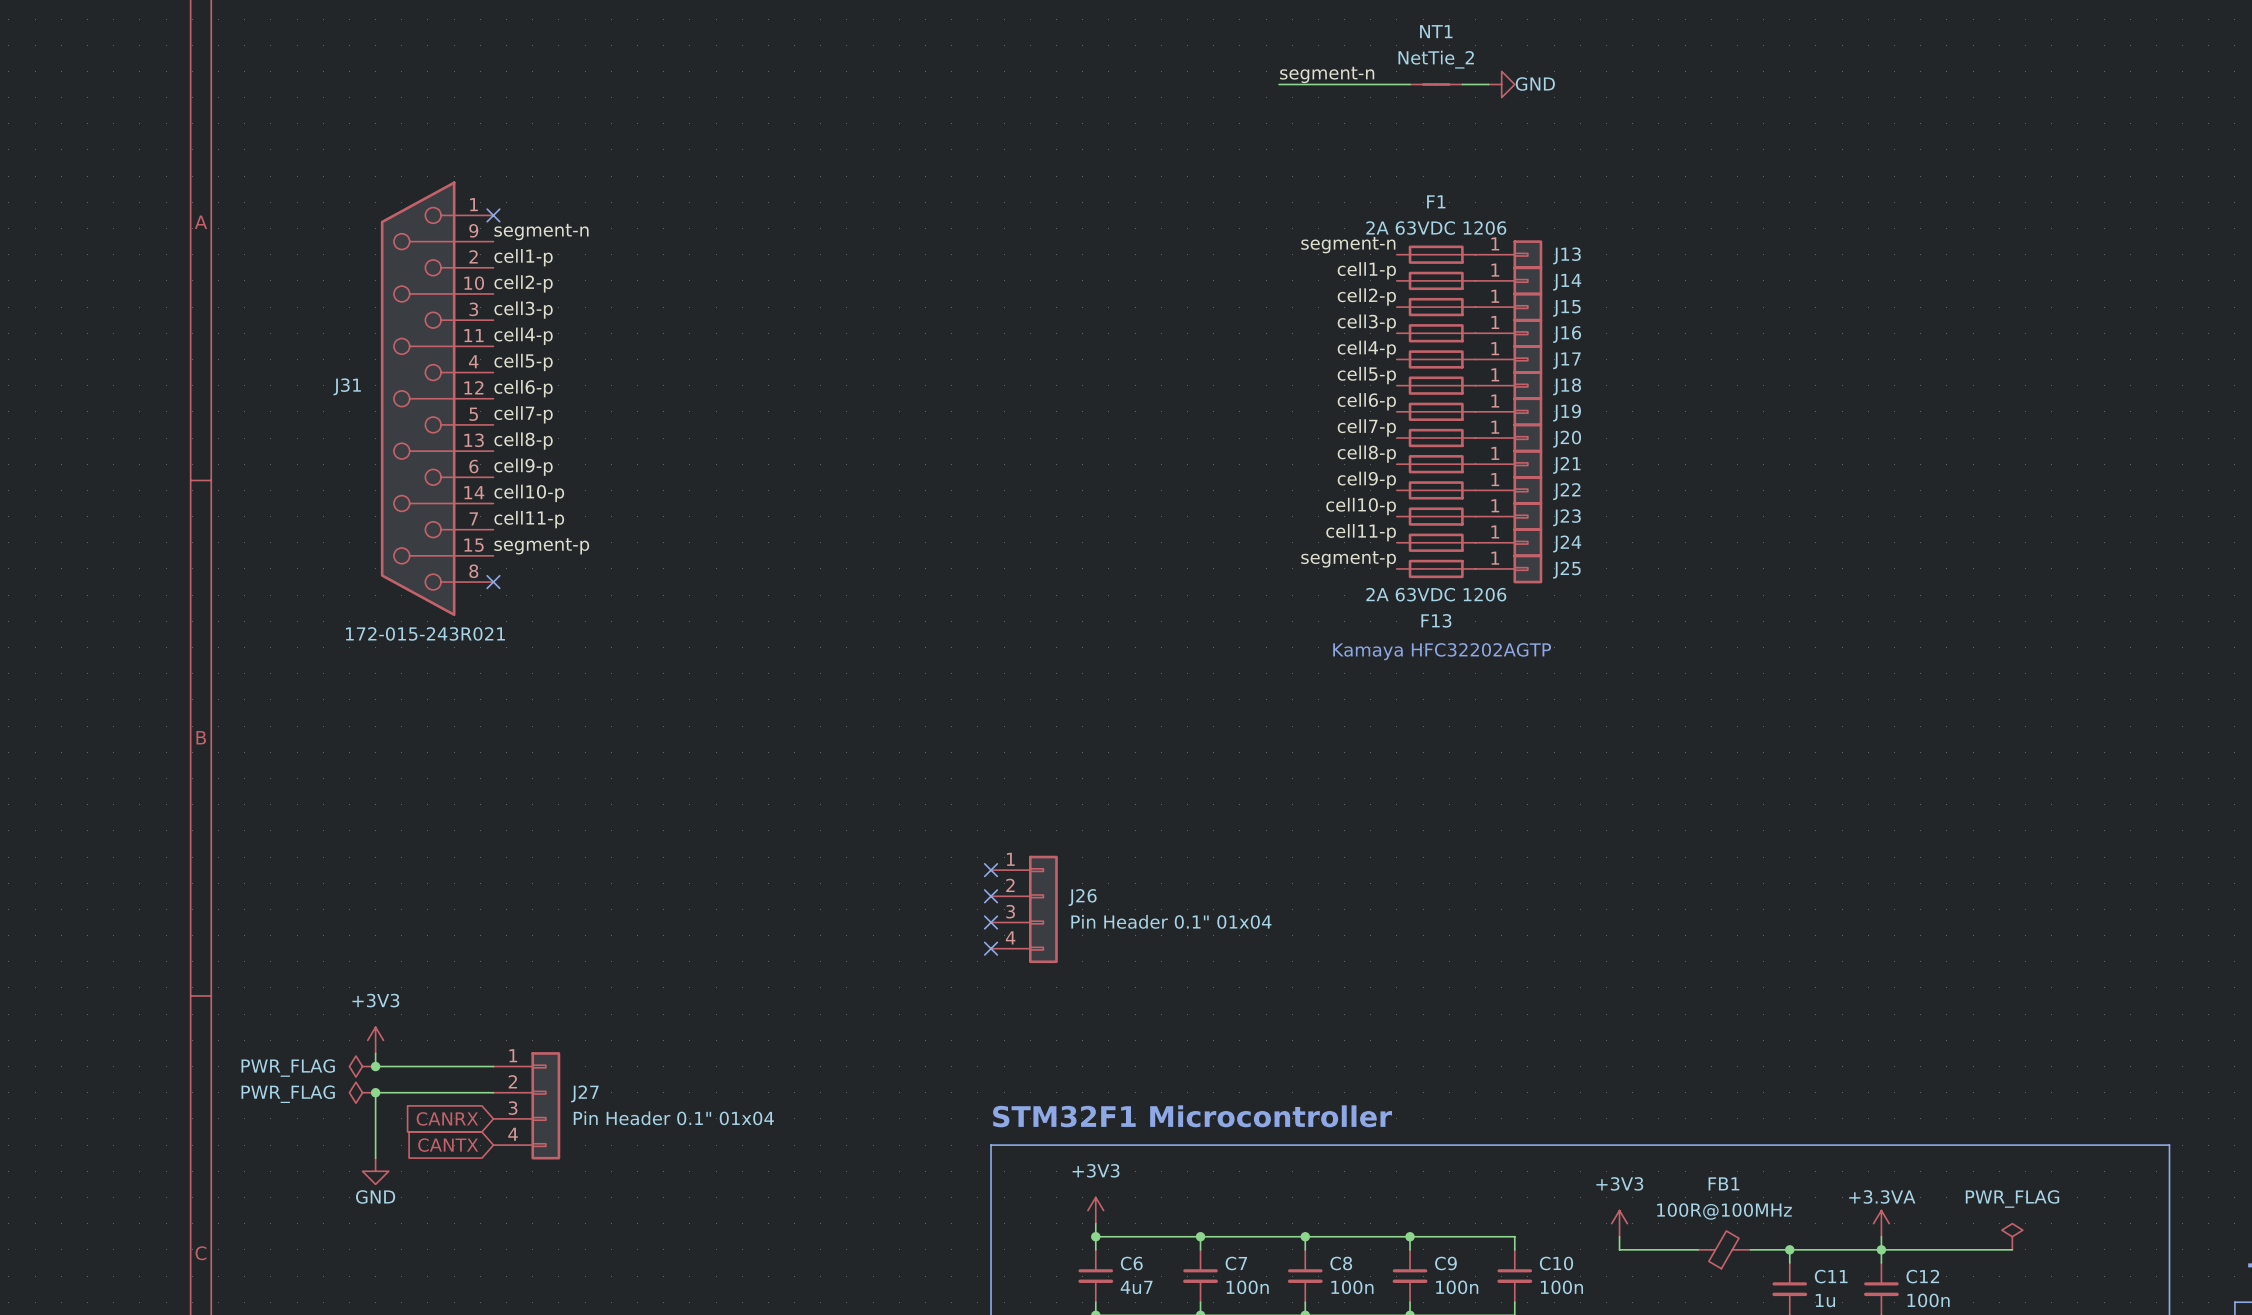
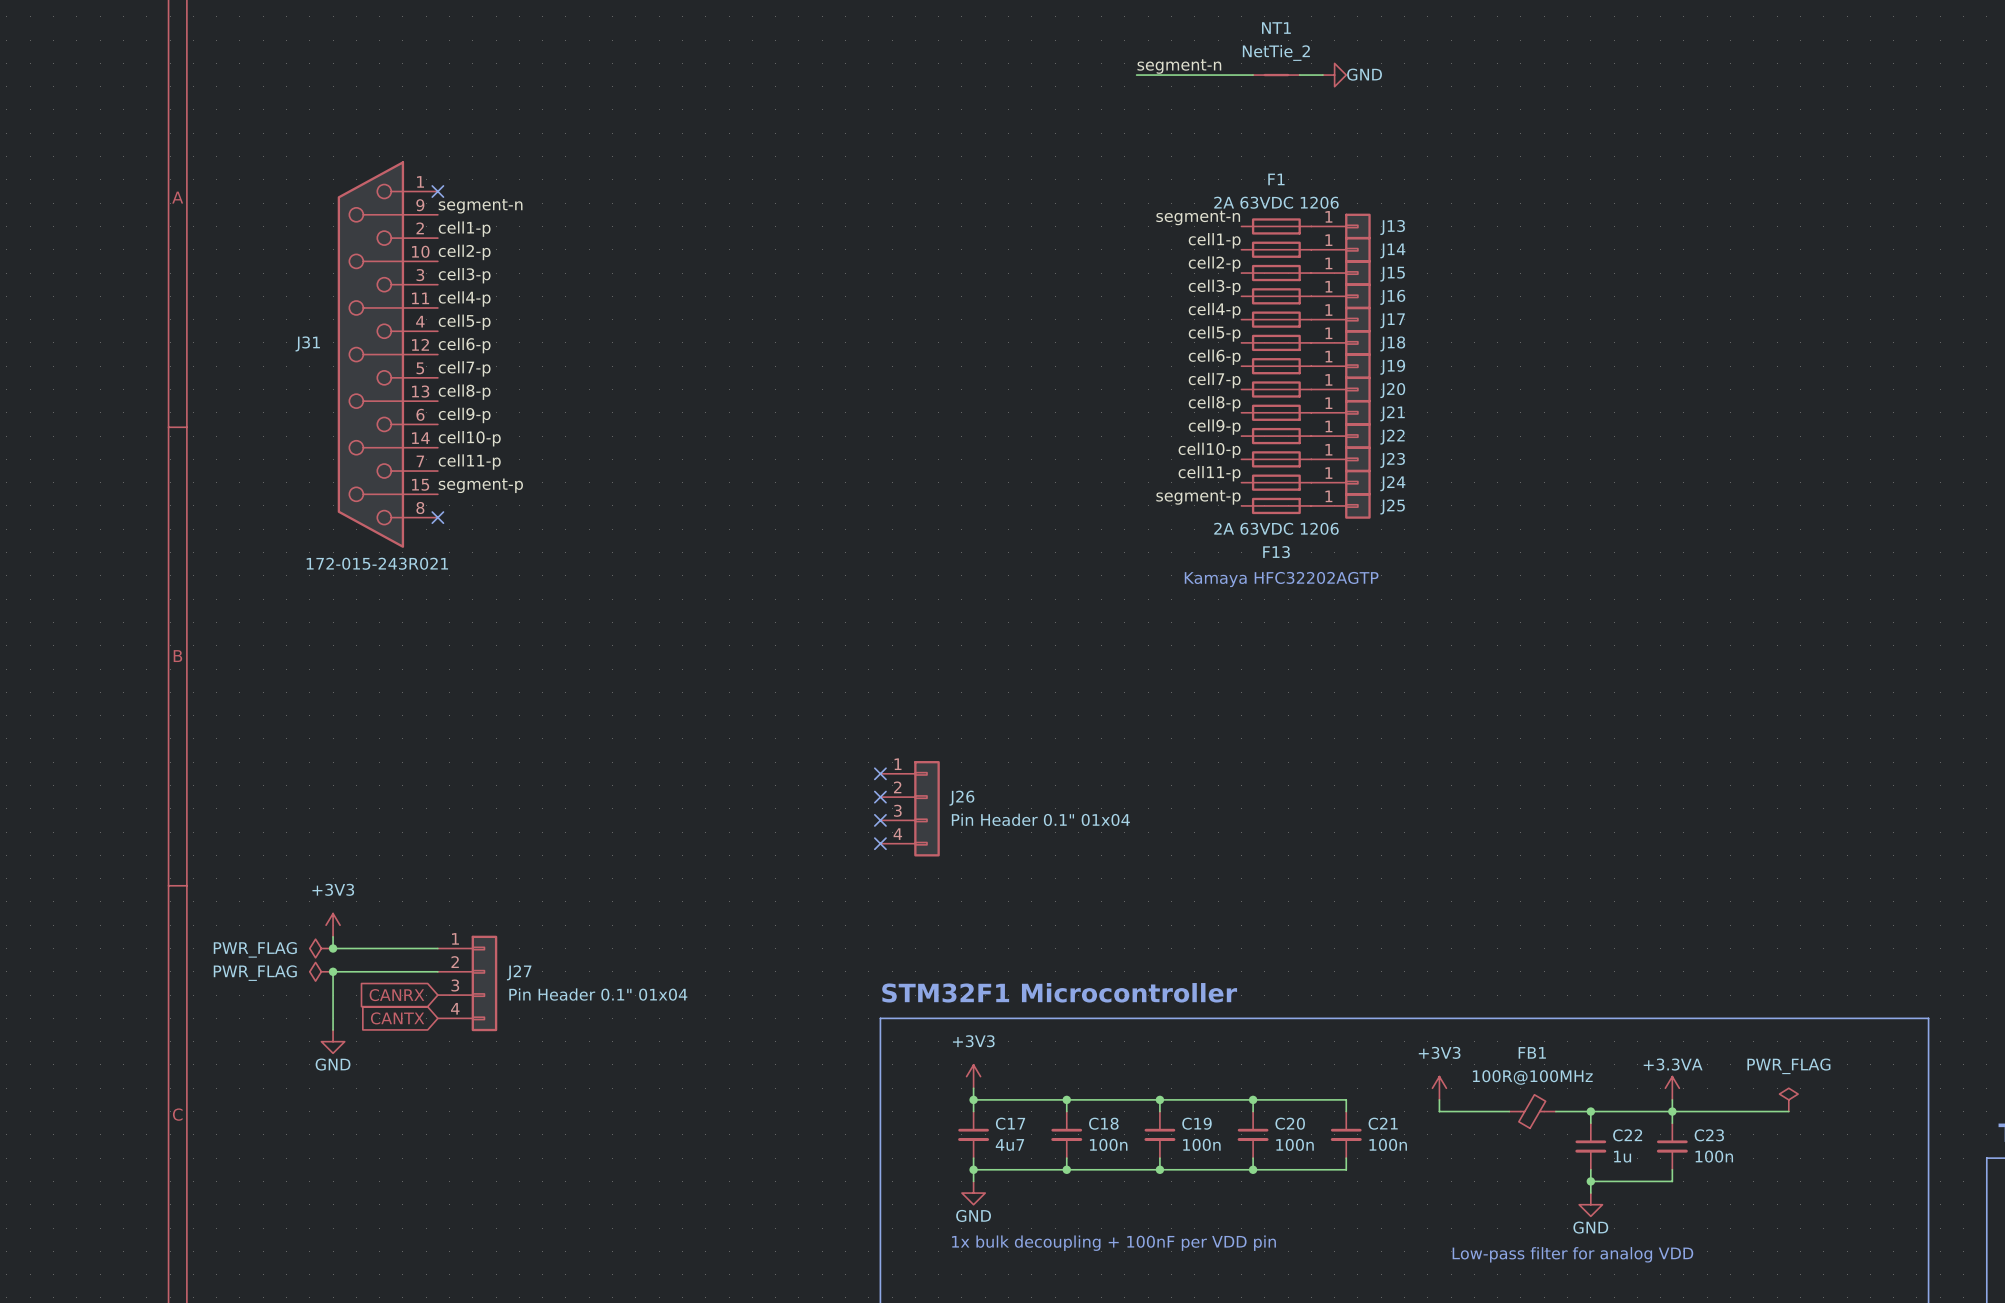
C6 name: C6 (1131, 1263) -> C17 (1010, 1123)
C7 name: C7 (1236, 1263) -> C18 (1103, 1123)
C8 name: C8 (1341, 1263) -> C19 (1196, 1123)
C9 name: C9 (1445, 1263) -> C20 (1290, 1123)
C10 name: C10 (1556, 1263) -> C21 (1383, 1123)
C11 name: C11 (1831, 1276) -> C22 (1627, 1135)
C12 name: C12 (1922, 1276) -> C23 (1709, 1135)

